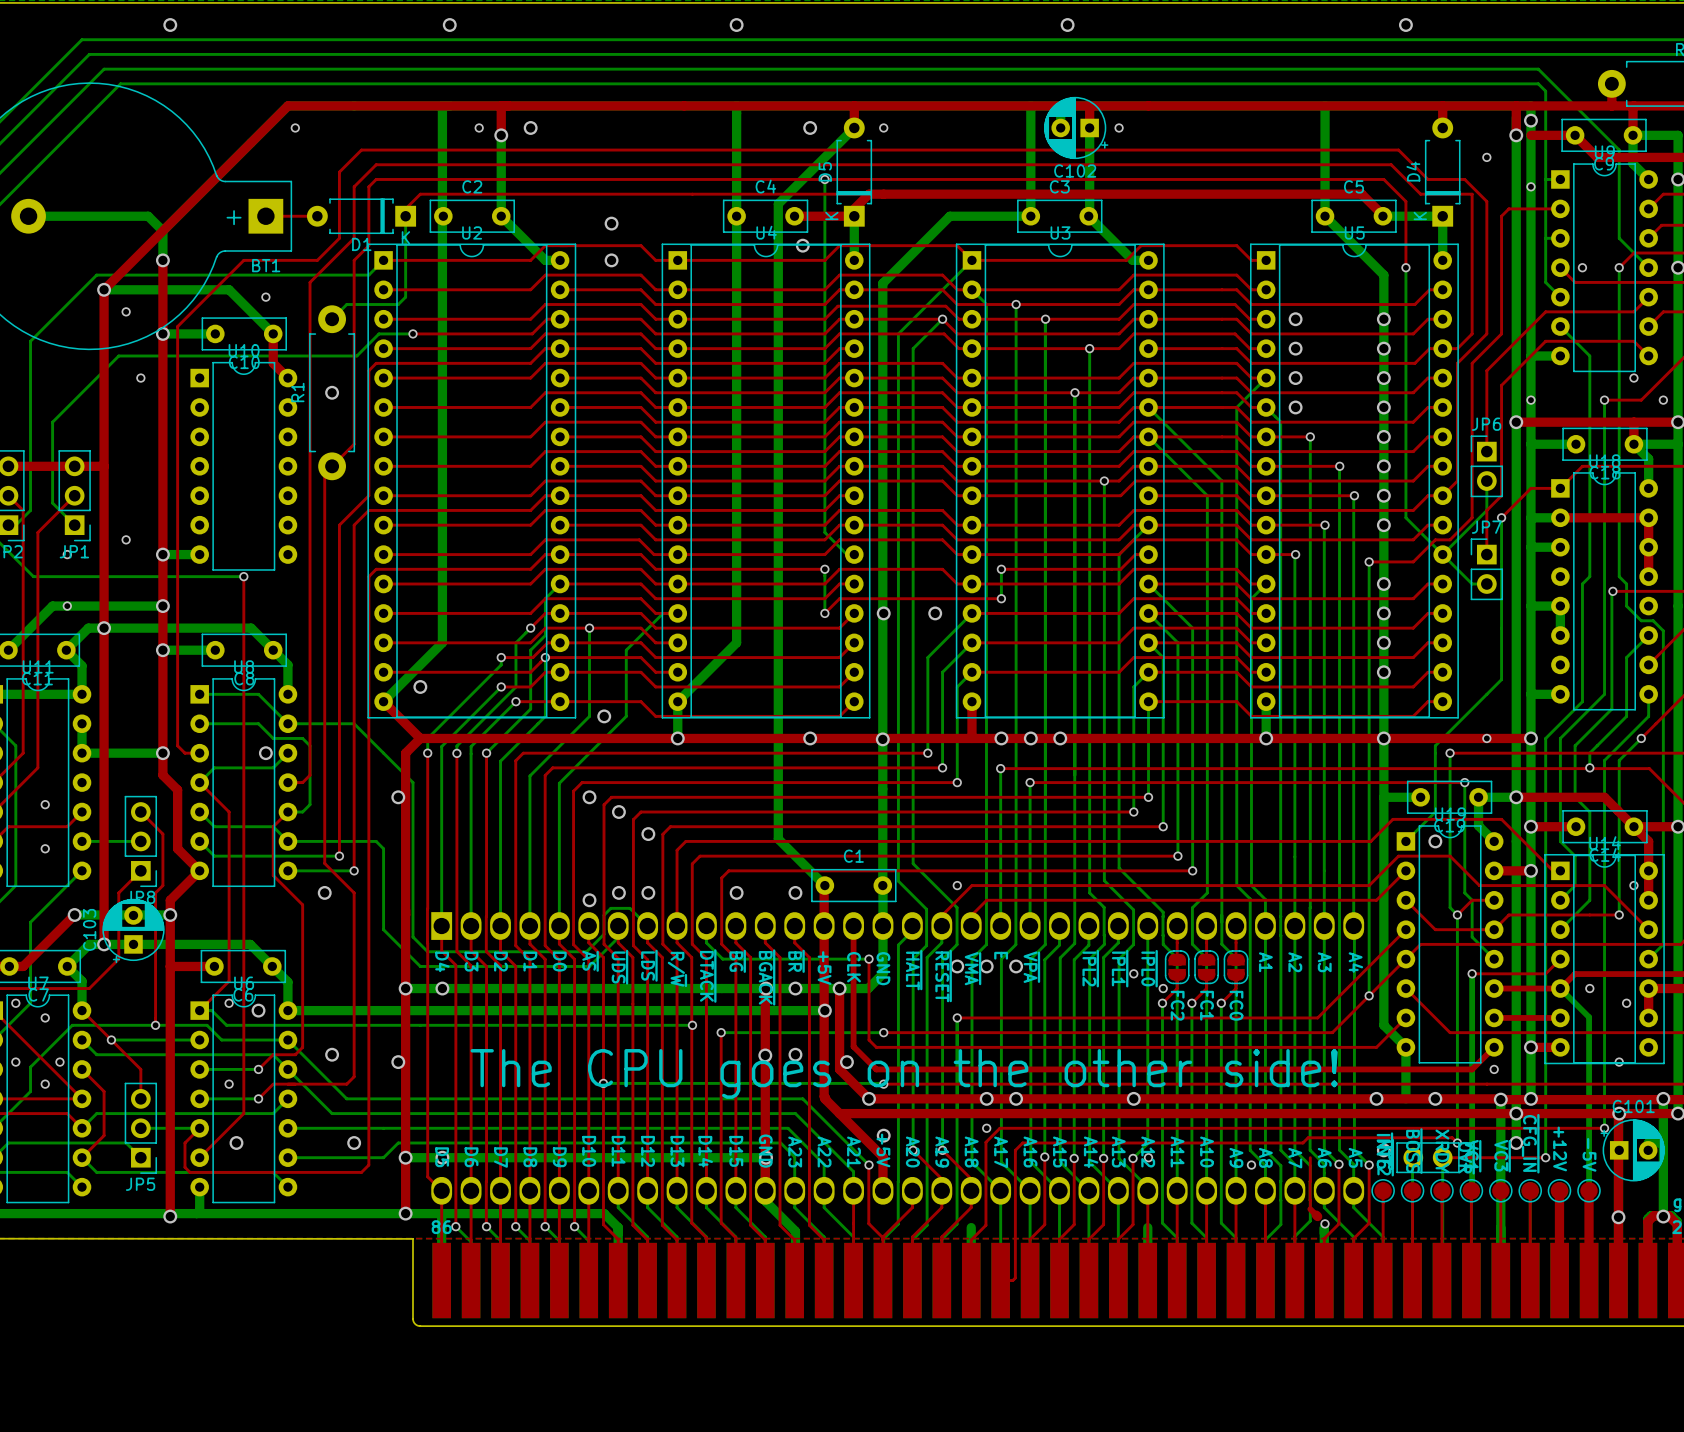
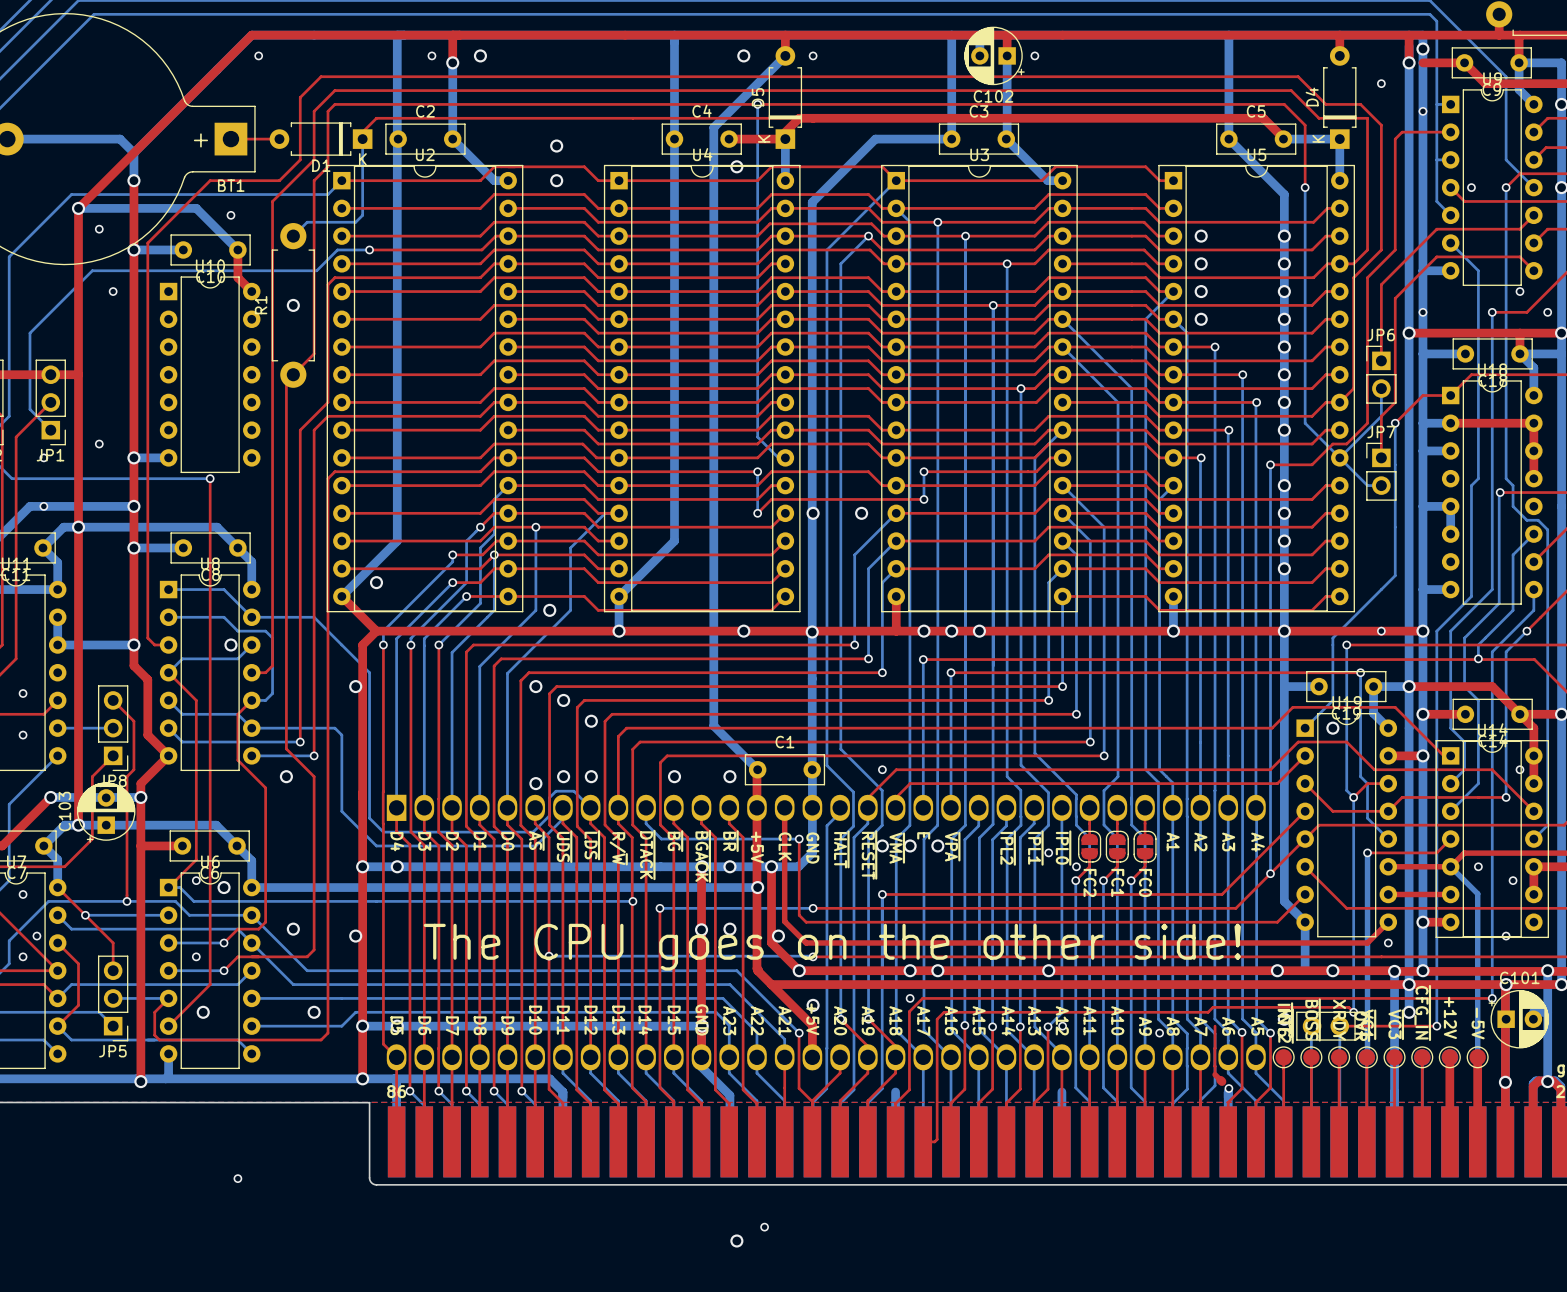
via: none -> (237, 1178)
via: none -> (764, 1227)
via: none -> (736, 1240)

